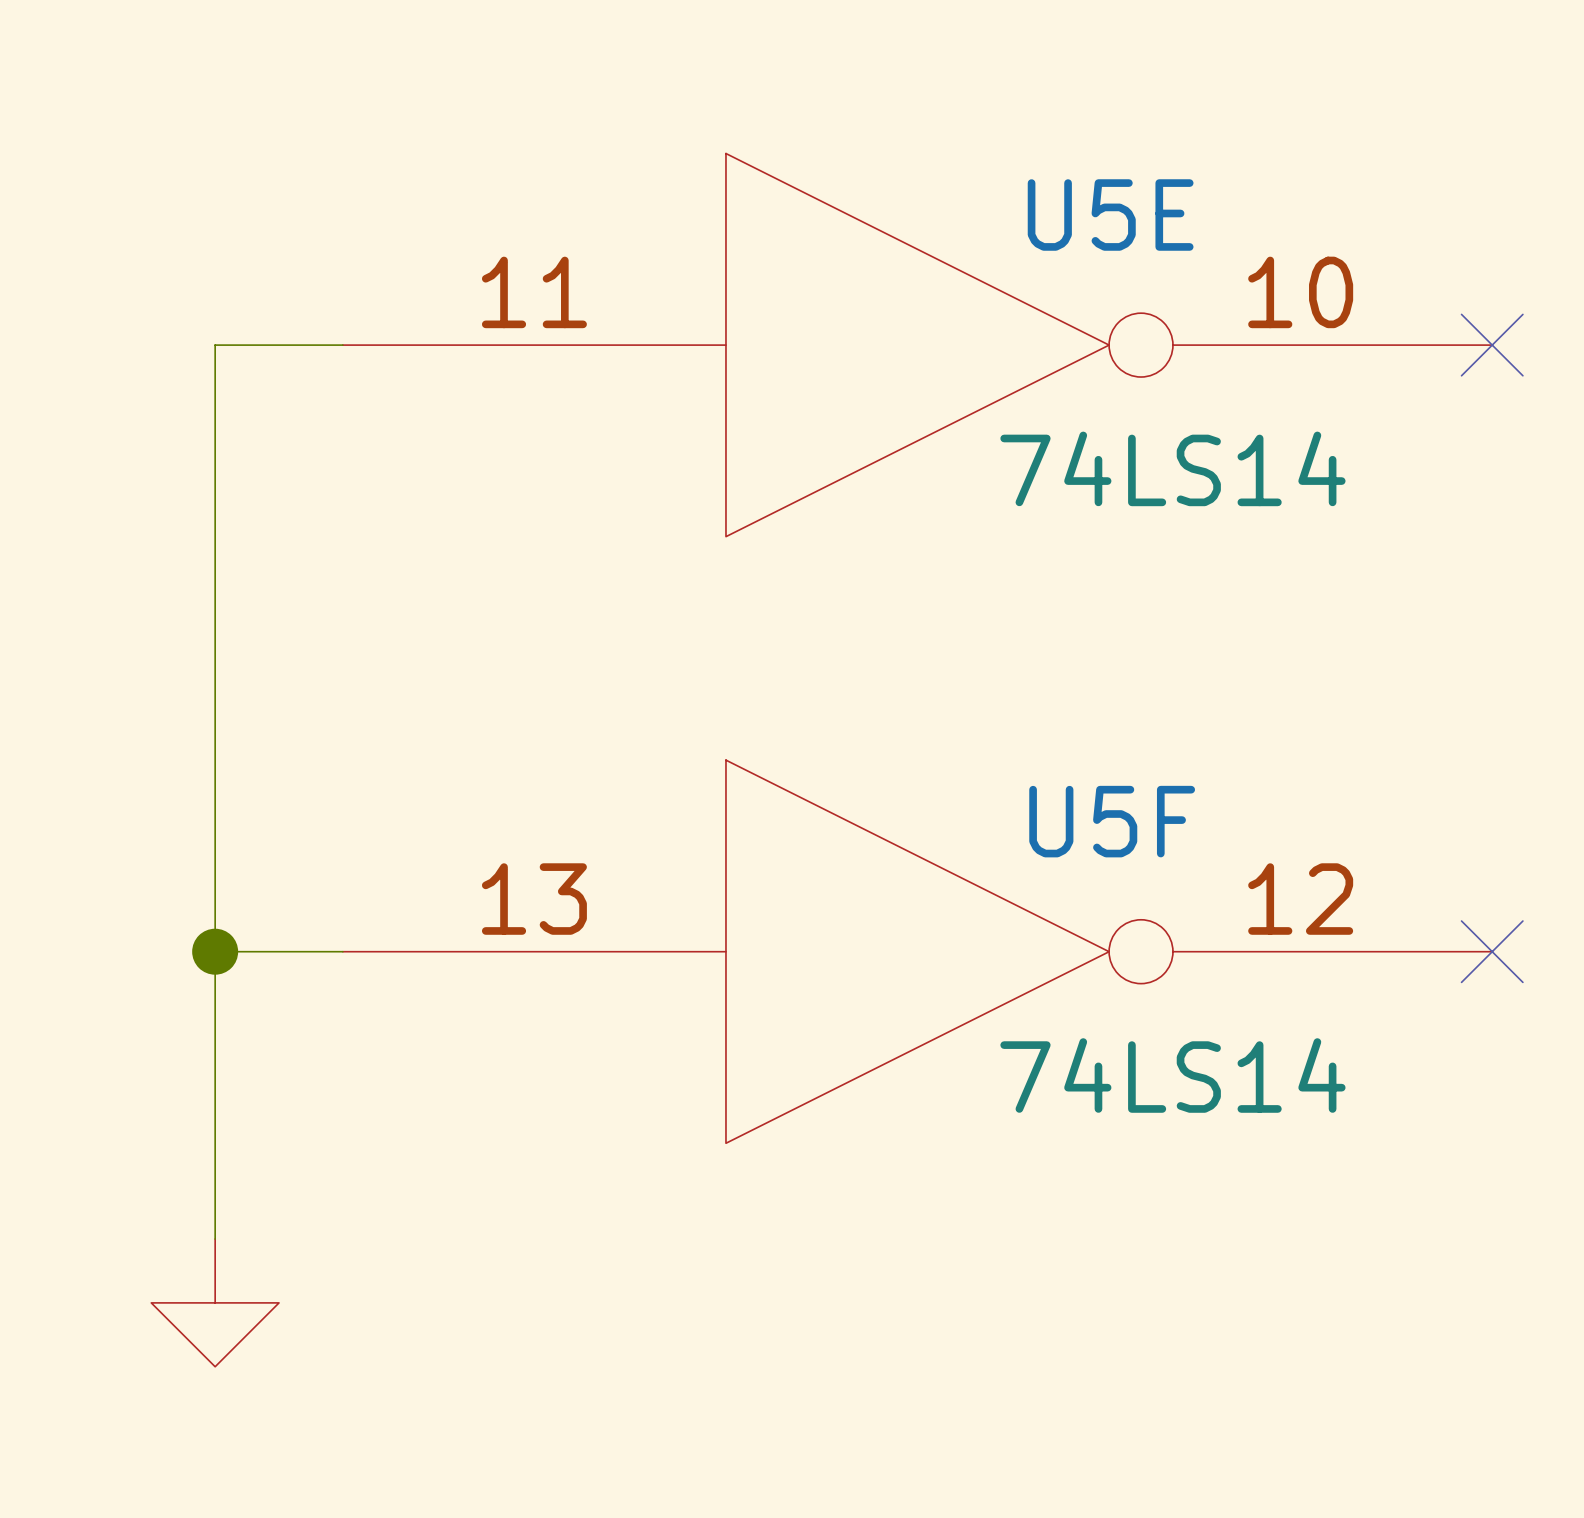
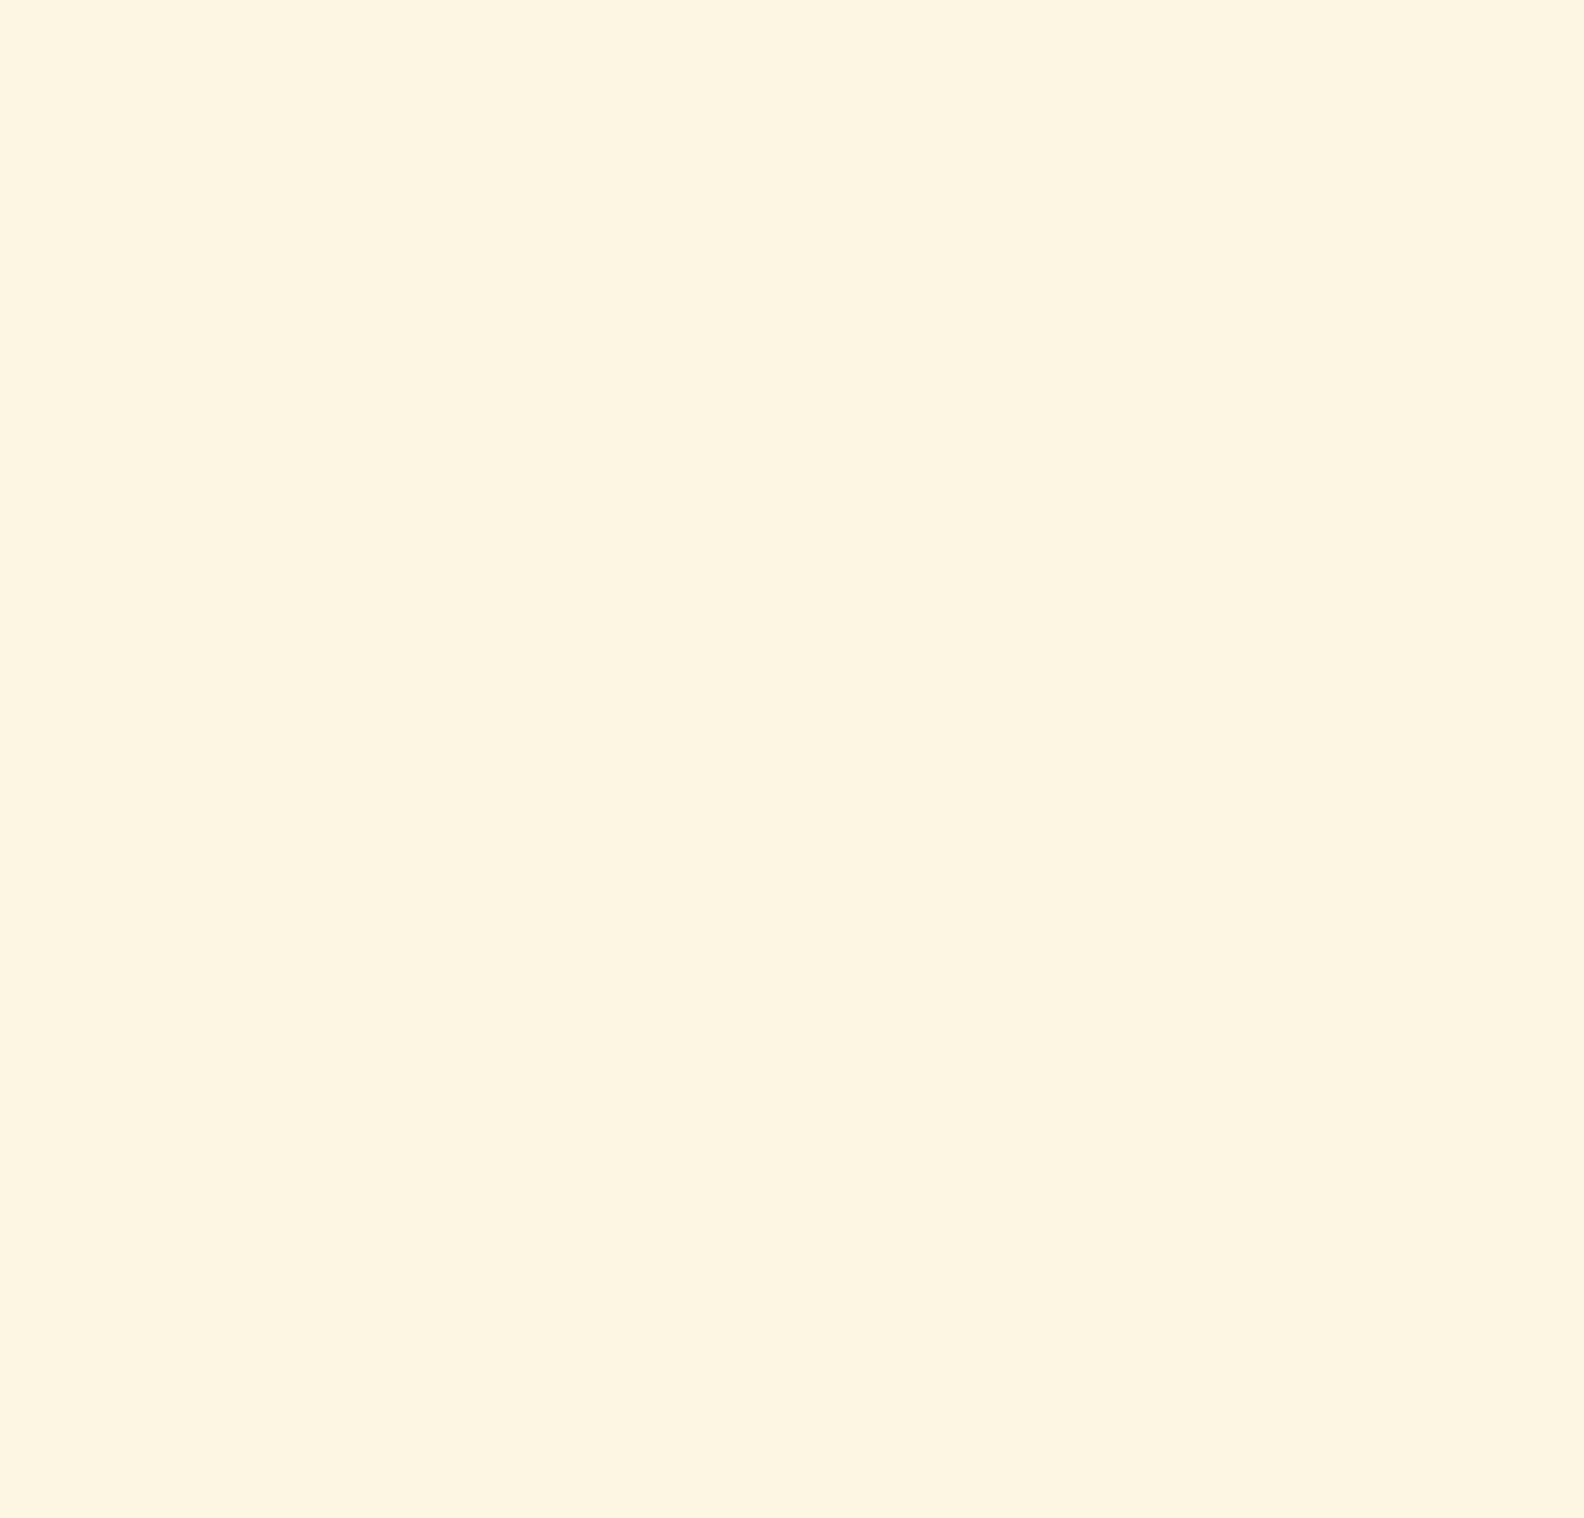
wire: (342, 345) (215, 345) (215, 1239) -> none
U5E: 74LS14 (917, 345) -> none
no-connect mark: (1492, 345) -> none
wire: (215, 951) (342, 951) -> none
junction: (215, 951) -> none
U5F: 74LS14 (917, 951) -> none
no-connect mark: (1492, 951) -> none
power symbol: (215, 1302) -> none

